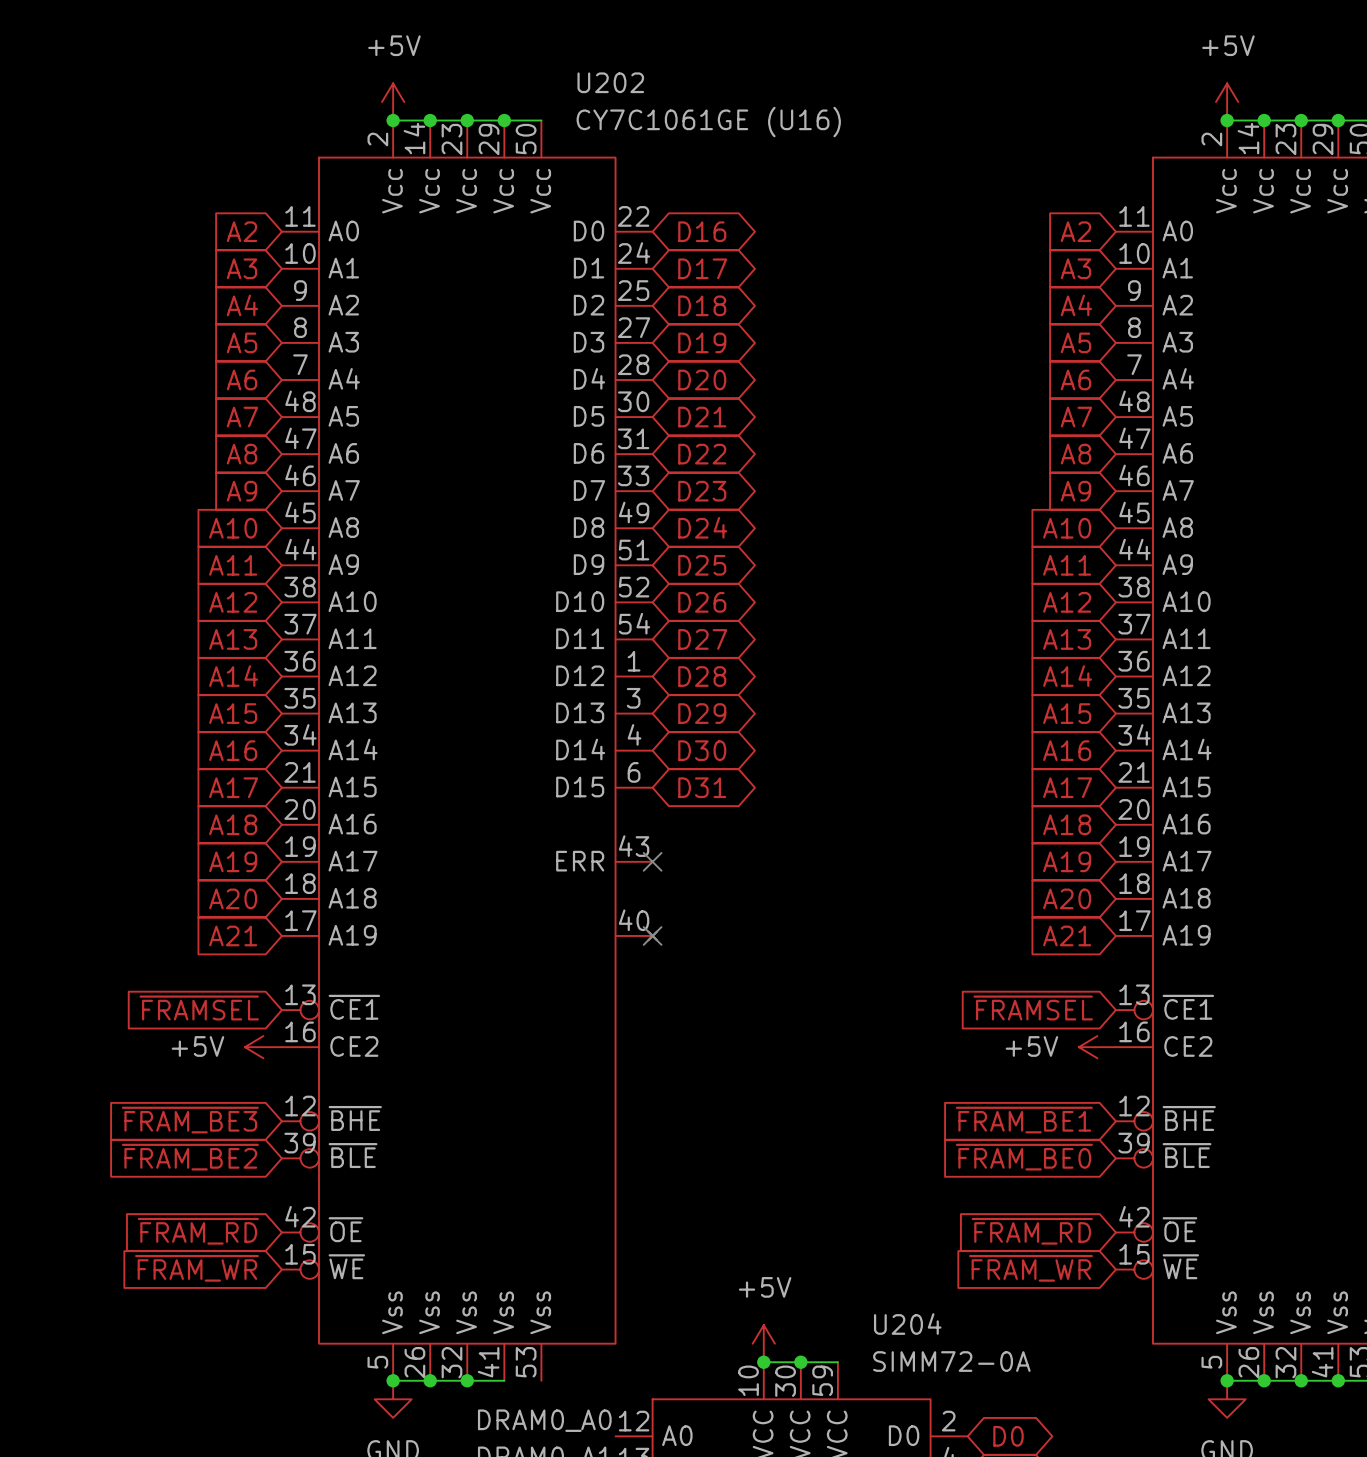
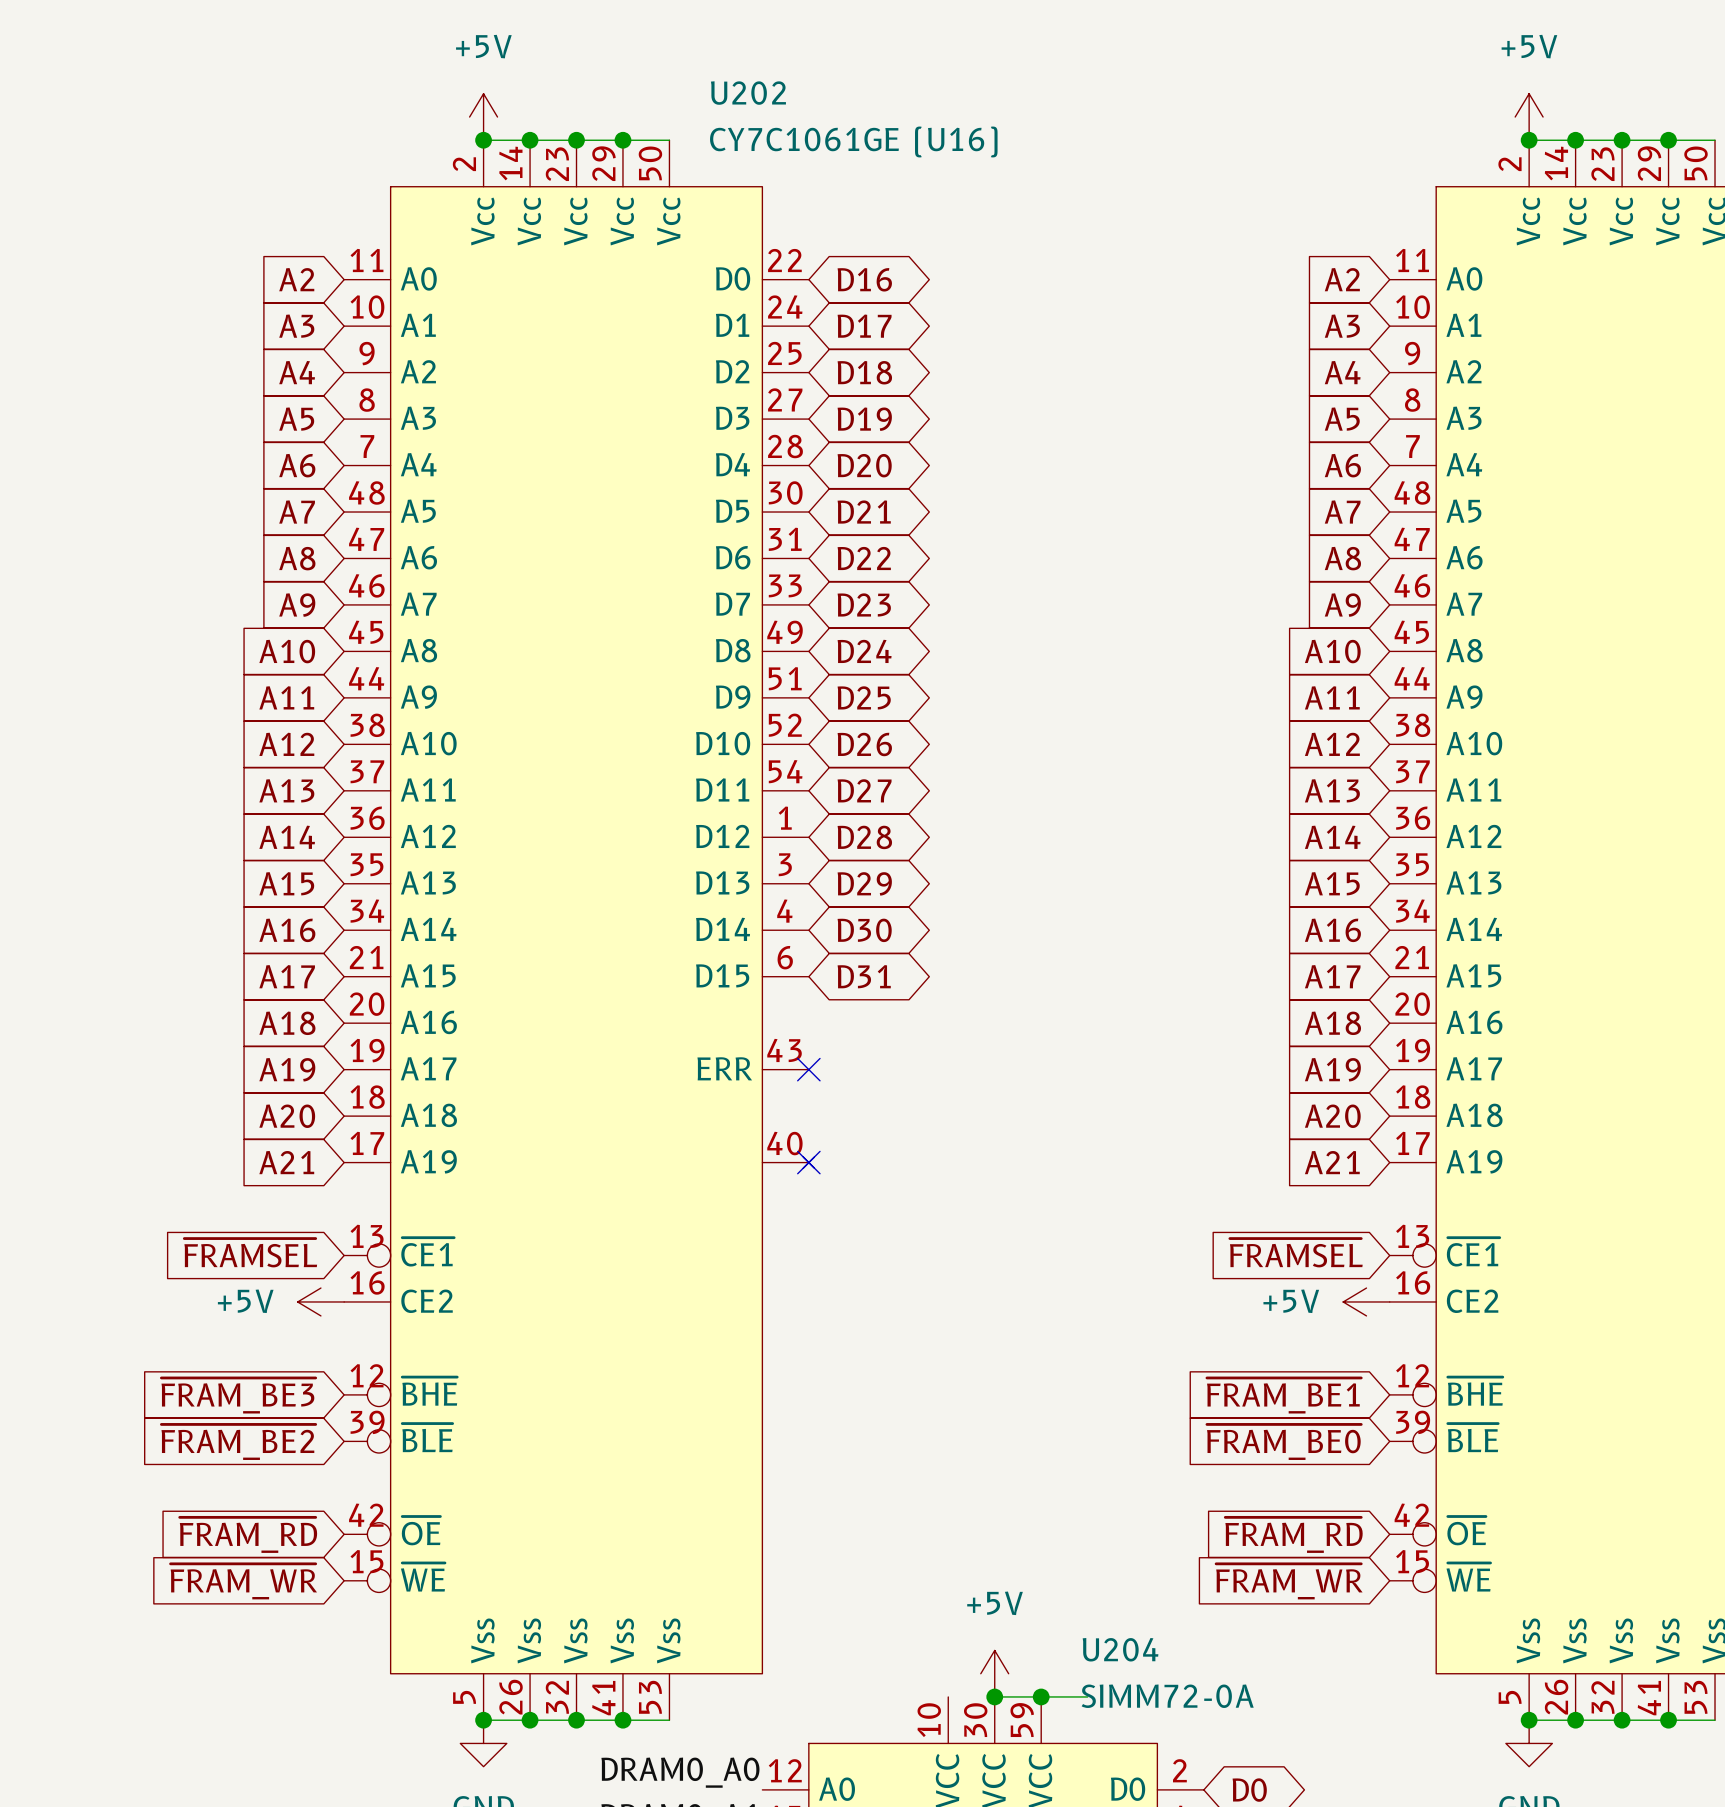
power symbol position: +5V (763, 1343) -> +5V (994, 1673)
wire: (763, 1362) (800, 1362) -> (1041, 1696) (1087, 1696)
junction position: (763, 1362) -> (1041, 1696)
wire: none -> (622, 1720) (669, 1720)
junction: none -> (622, 1720)

